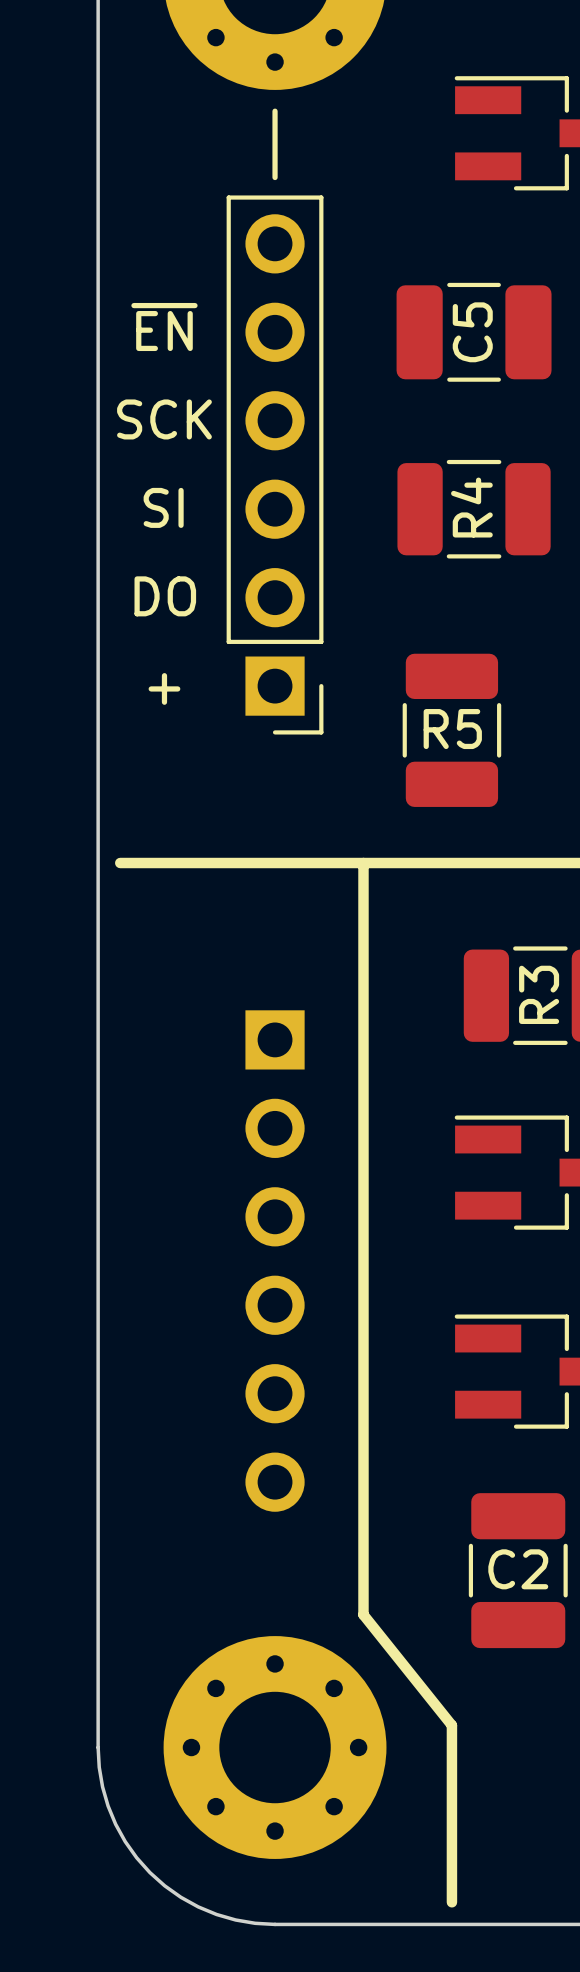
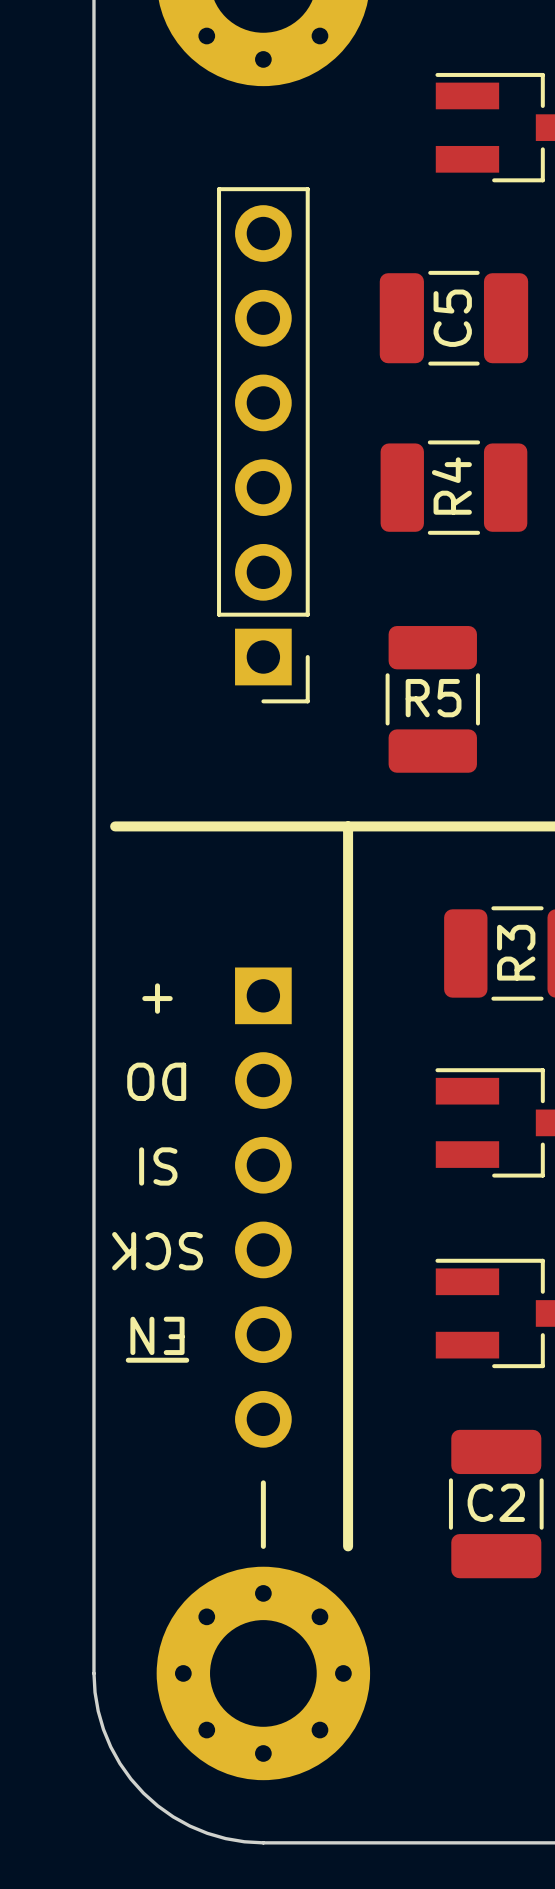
line: (275, 111) (275, 177) -> none
text: ~{EN} (164, 327) -> none
text: SCK (164, 419) -> none
text rotation: 0° (163, 507) -> 180° (158, 1166)
text position: SI (163, 507) -> SI (158, 1166)
text rotation: 0° (165, 596) -> 180° (156, 1081)
text position: DO (165, 596) -> DO (156, 1081)
text position: + (164, 688) -> + (157, 998)
text: none -> SCK (157, 1251)
text: none -> ~{EN} (157, 1339)
line: none -> (263, 1482) (263, 1546)
line: (363, 1614) (451, 1725) (451, 1902) -> none

